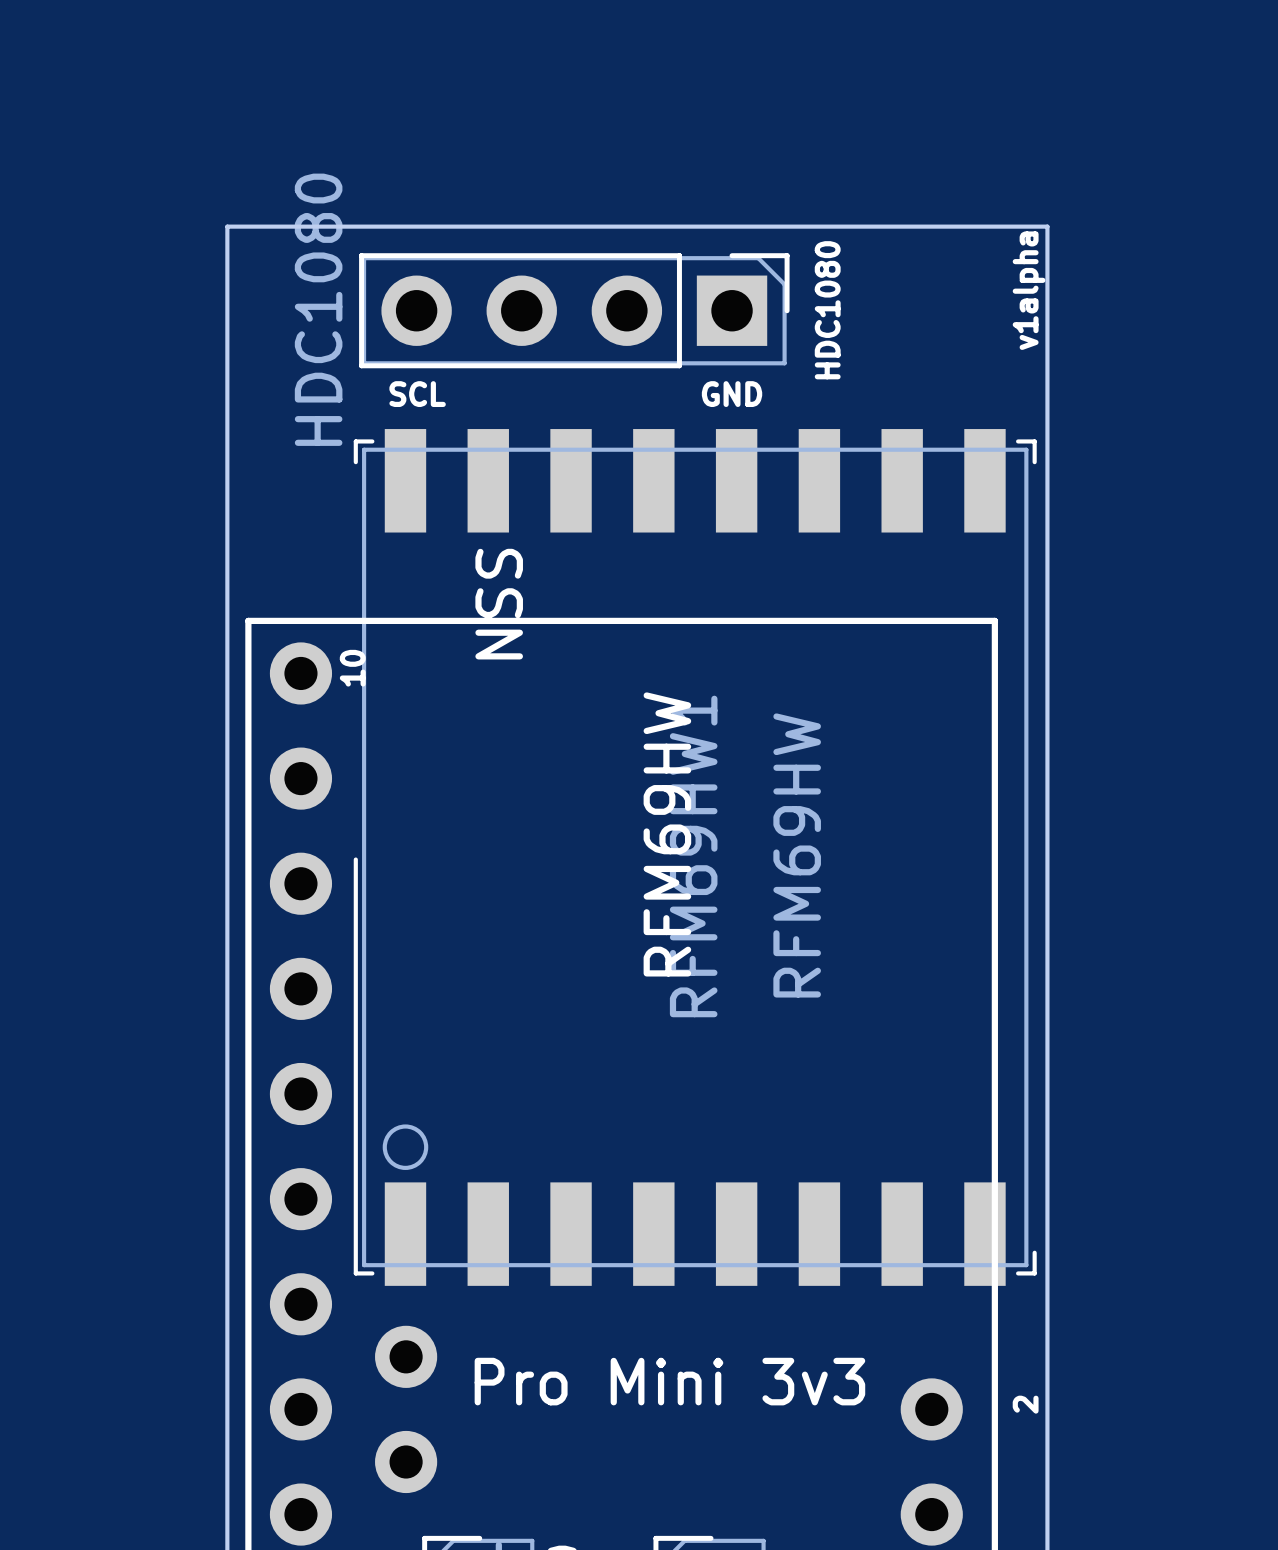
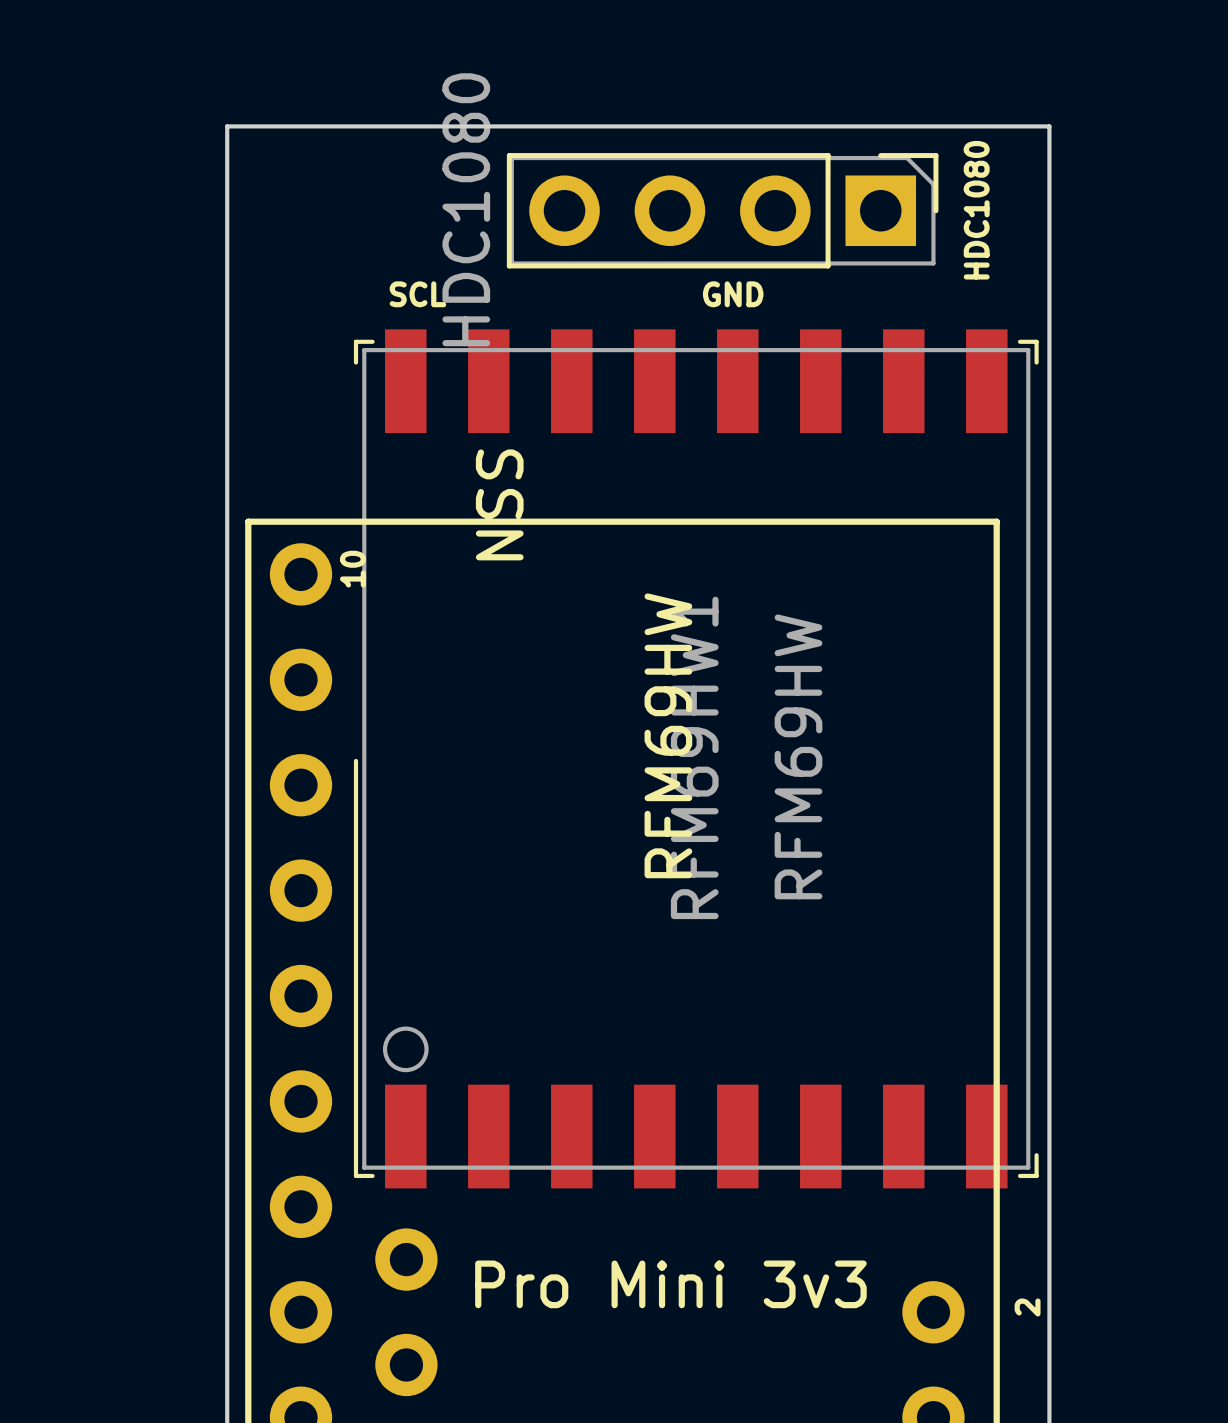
text: v1alpha (1029, 290) -> none
HDC1080 position: (574, 310) -> (722, 210)

